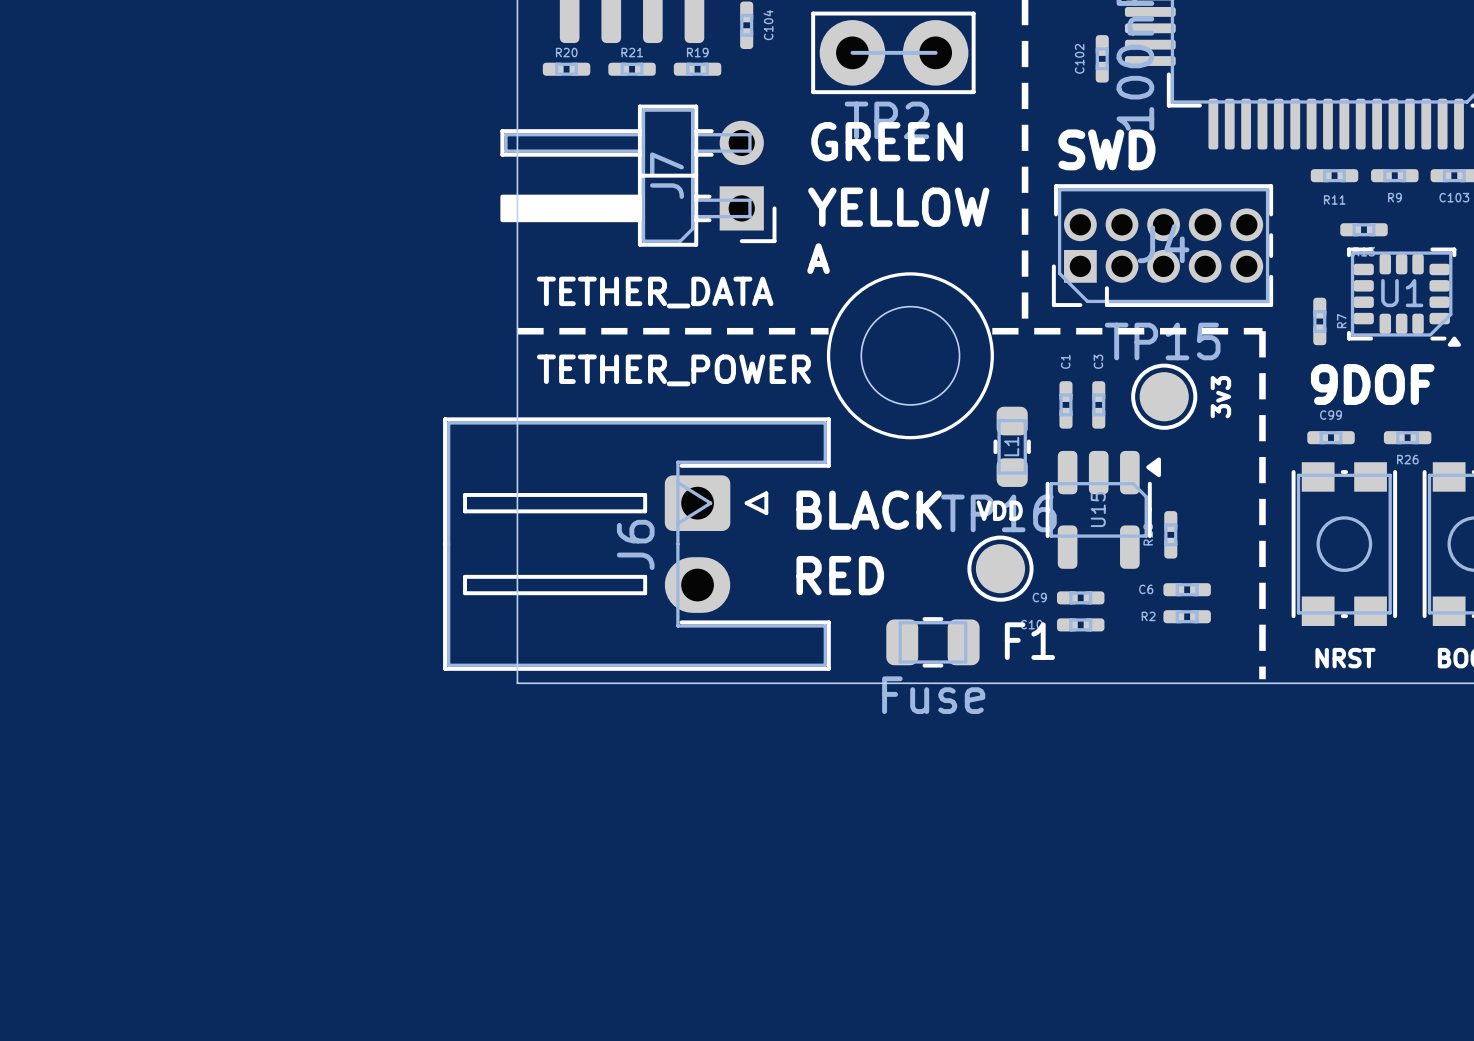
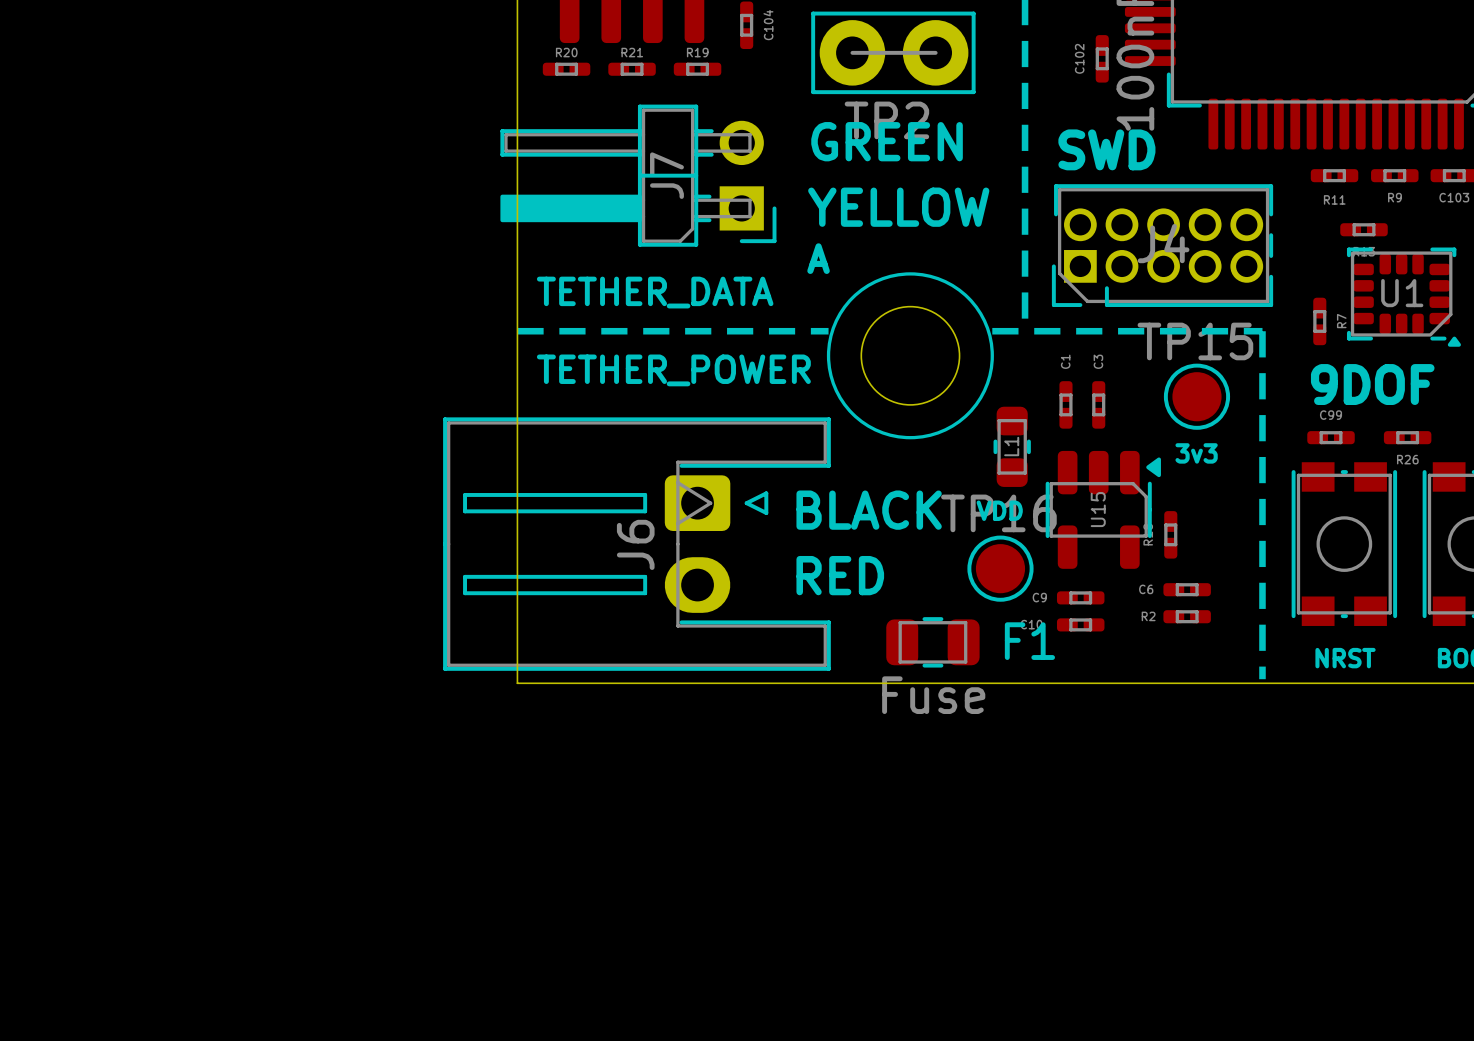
TP15 position: (1164, 396) -> (1196, 396)
TP15 value rotation: 0° (1220, 397) -> 90° clockwise (1196, 453)
TP15 value position: 3v3 (1220, 397) -> 3v3 (1196, 453)

